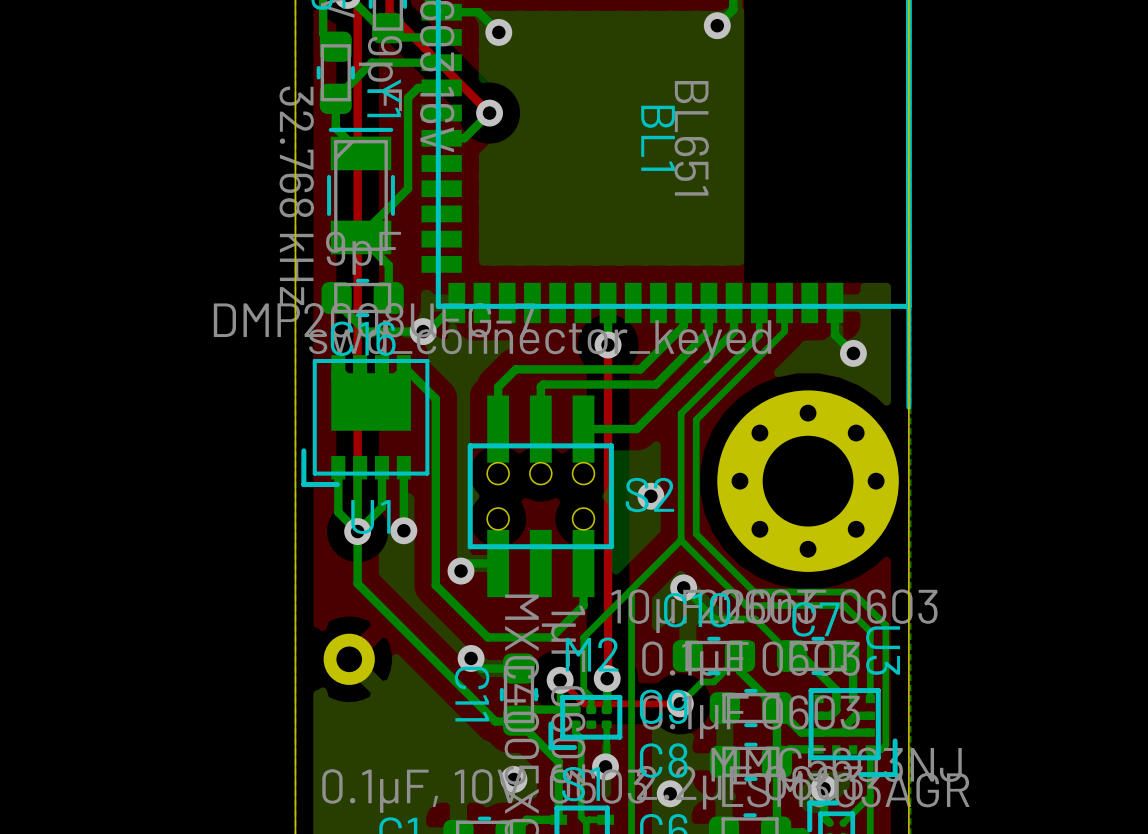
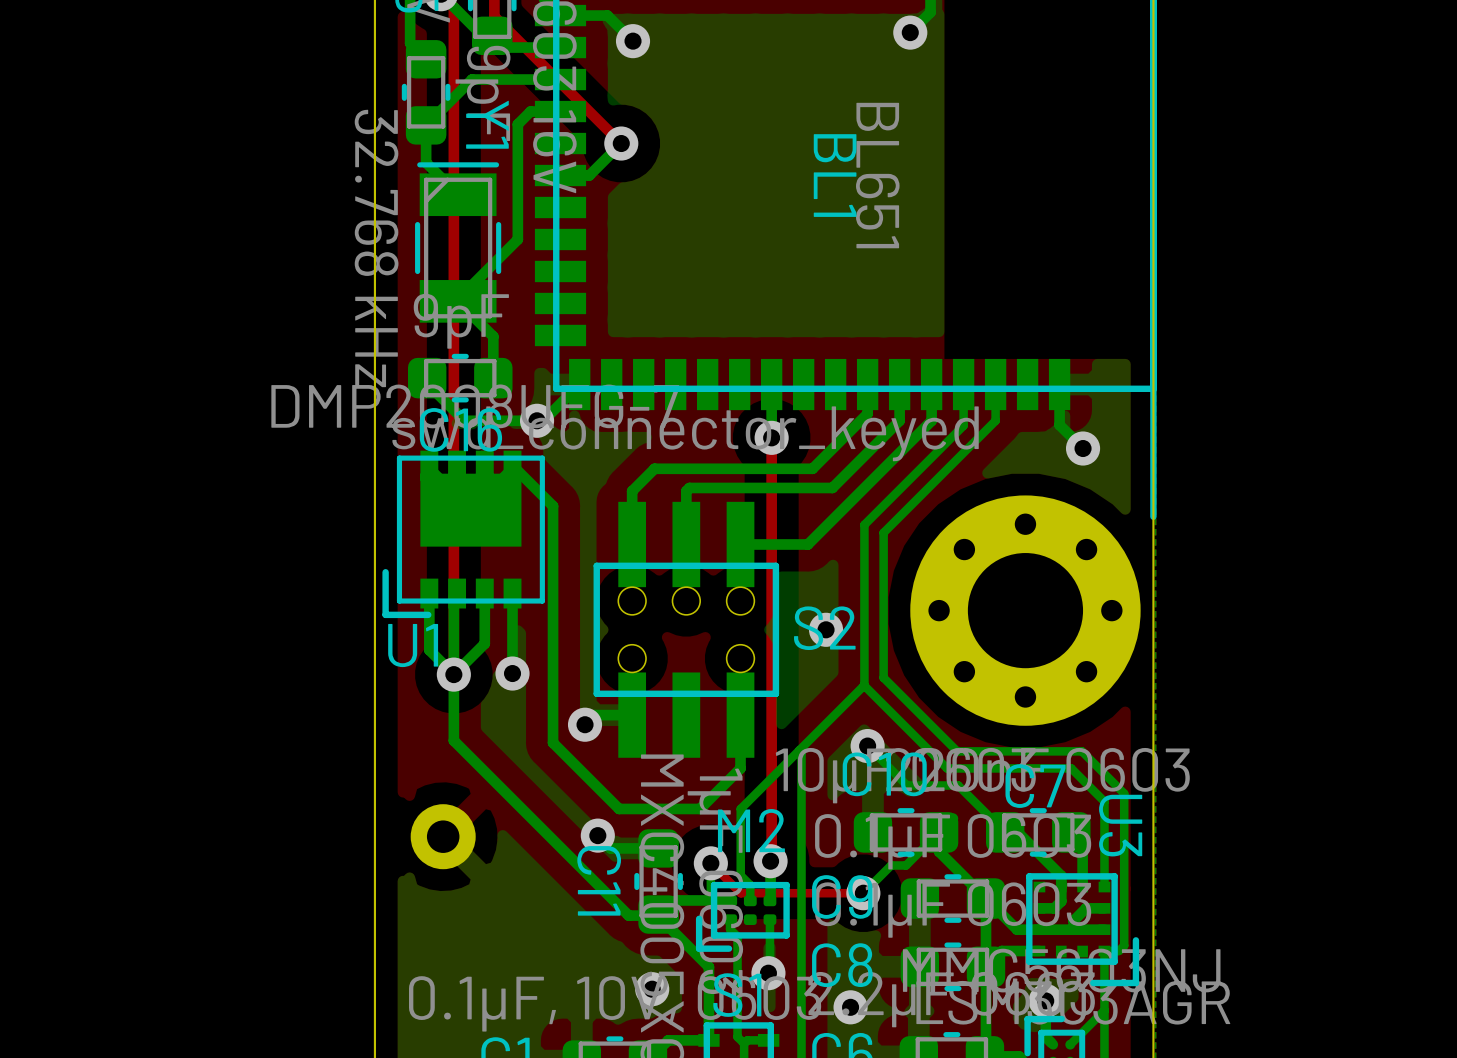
U1 name position: U1 (370, 517) -> U1 (413, 645)

